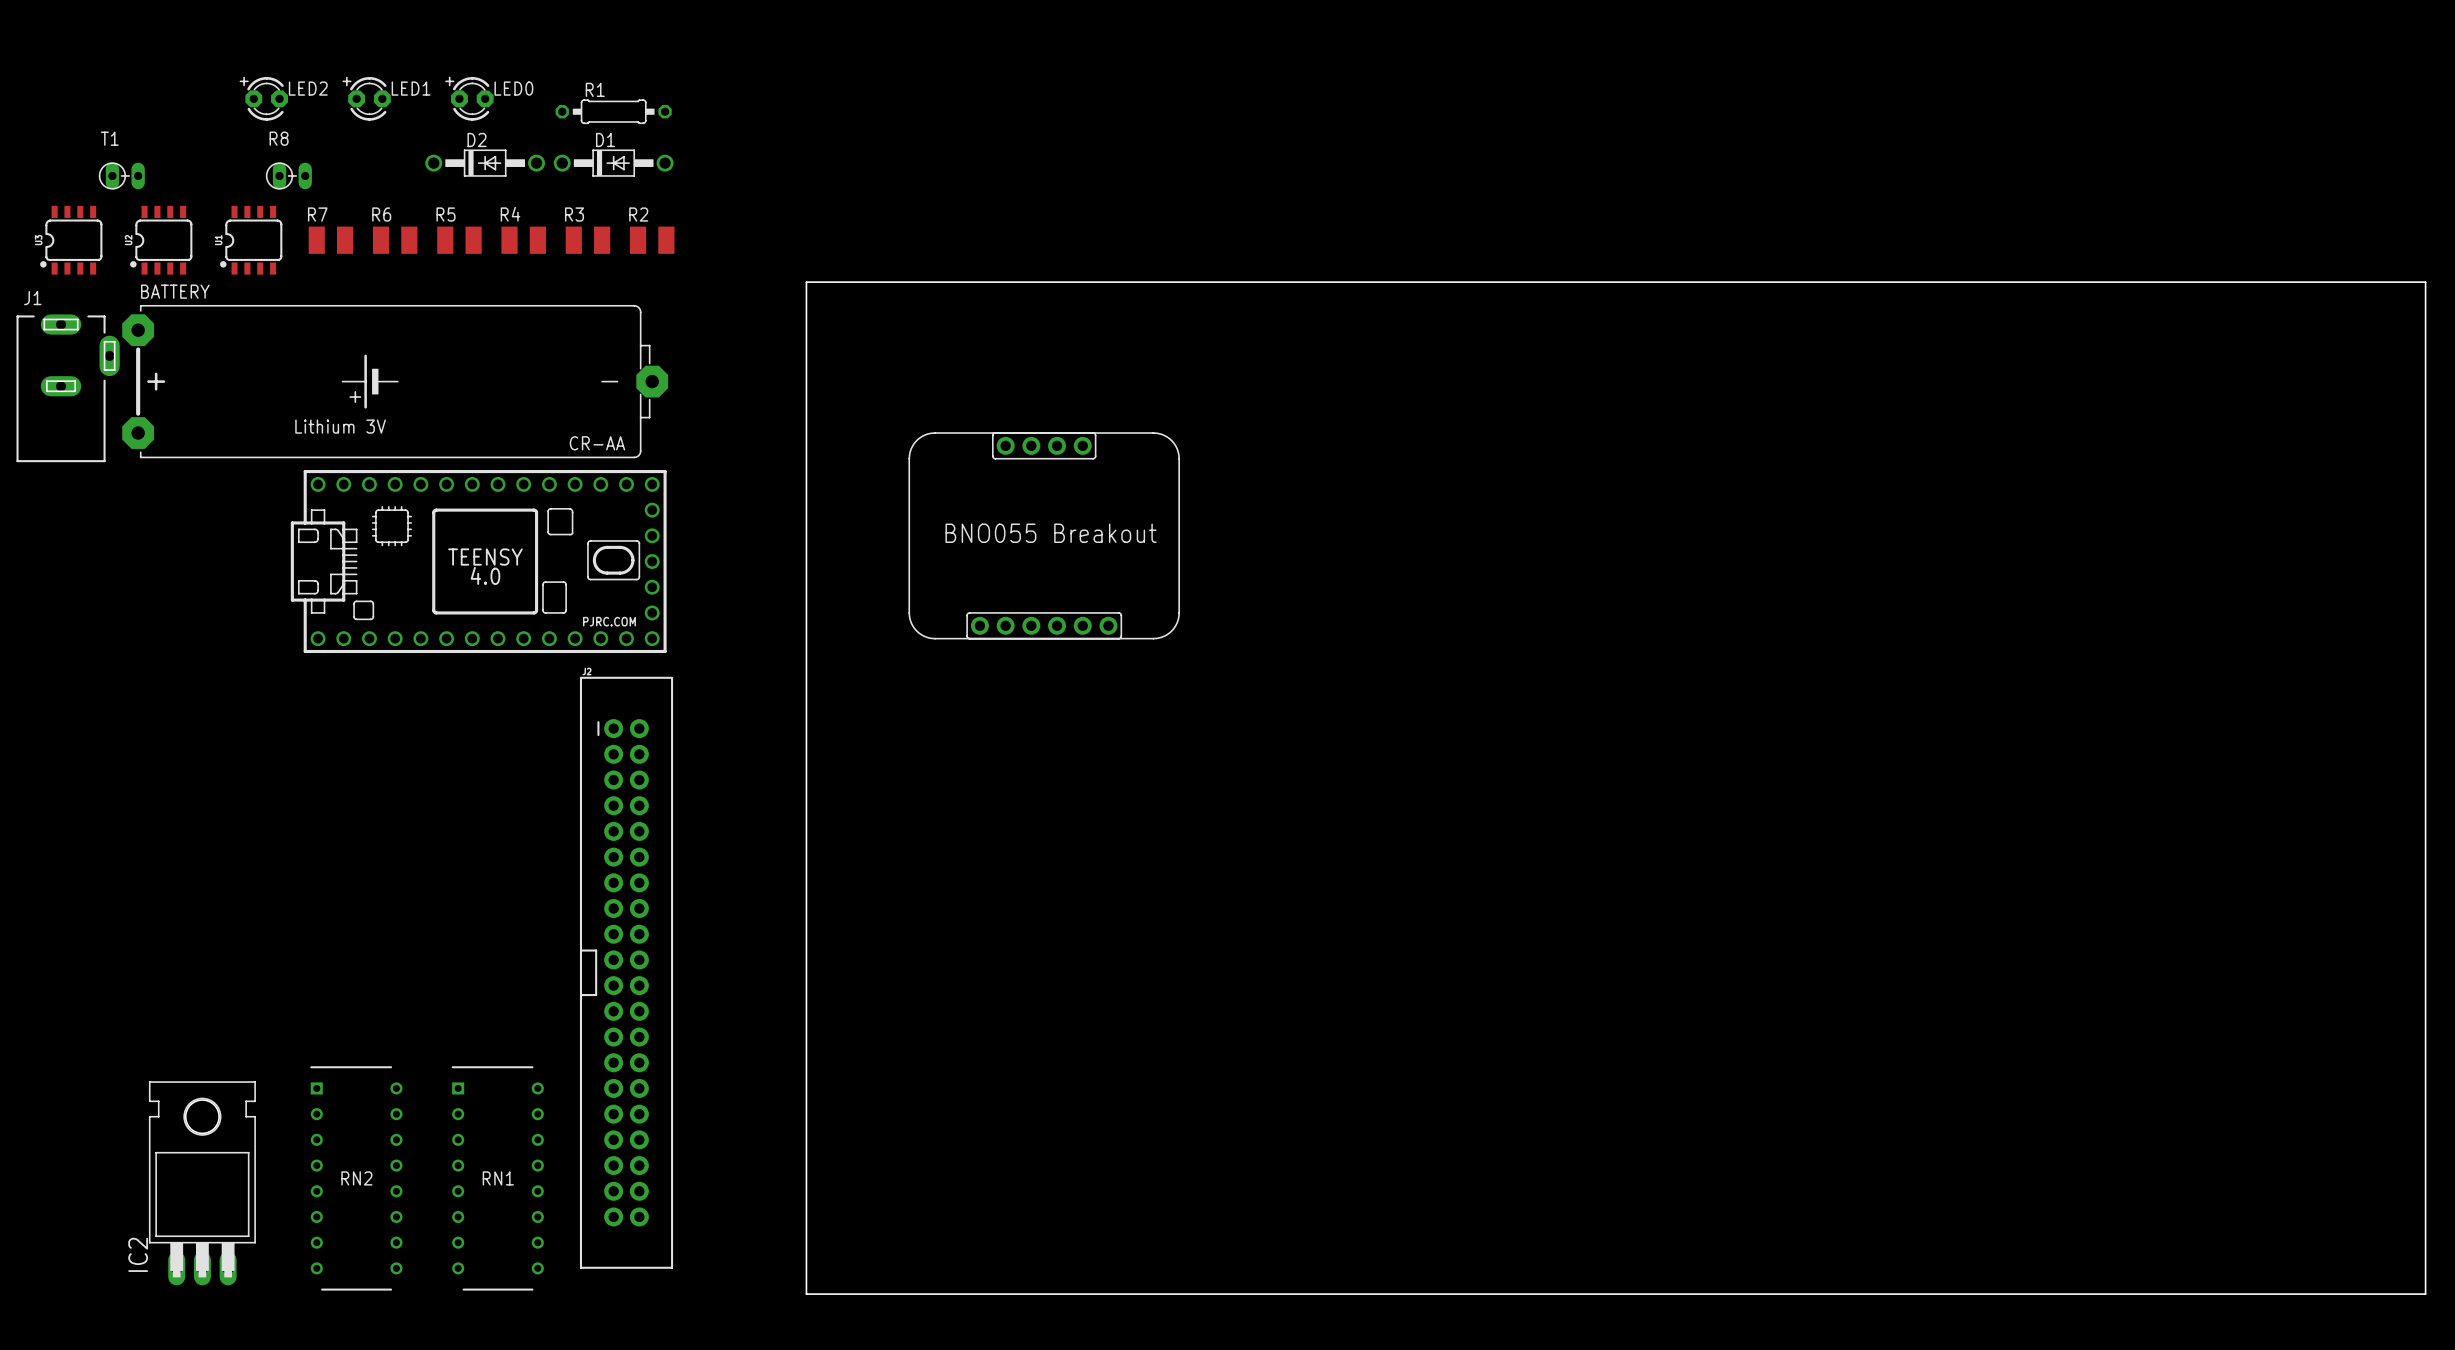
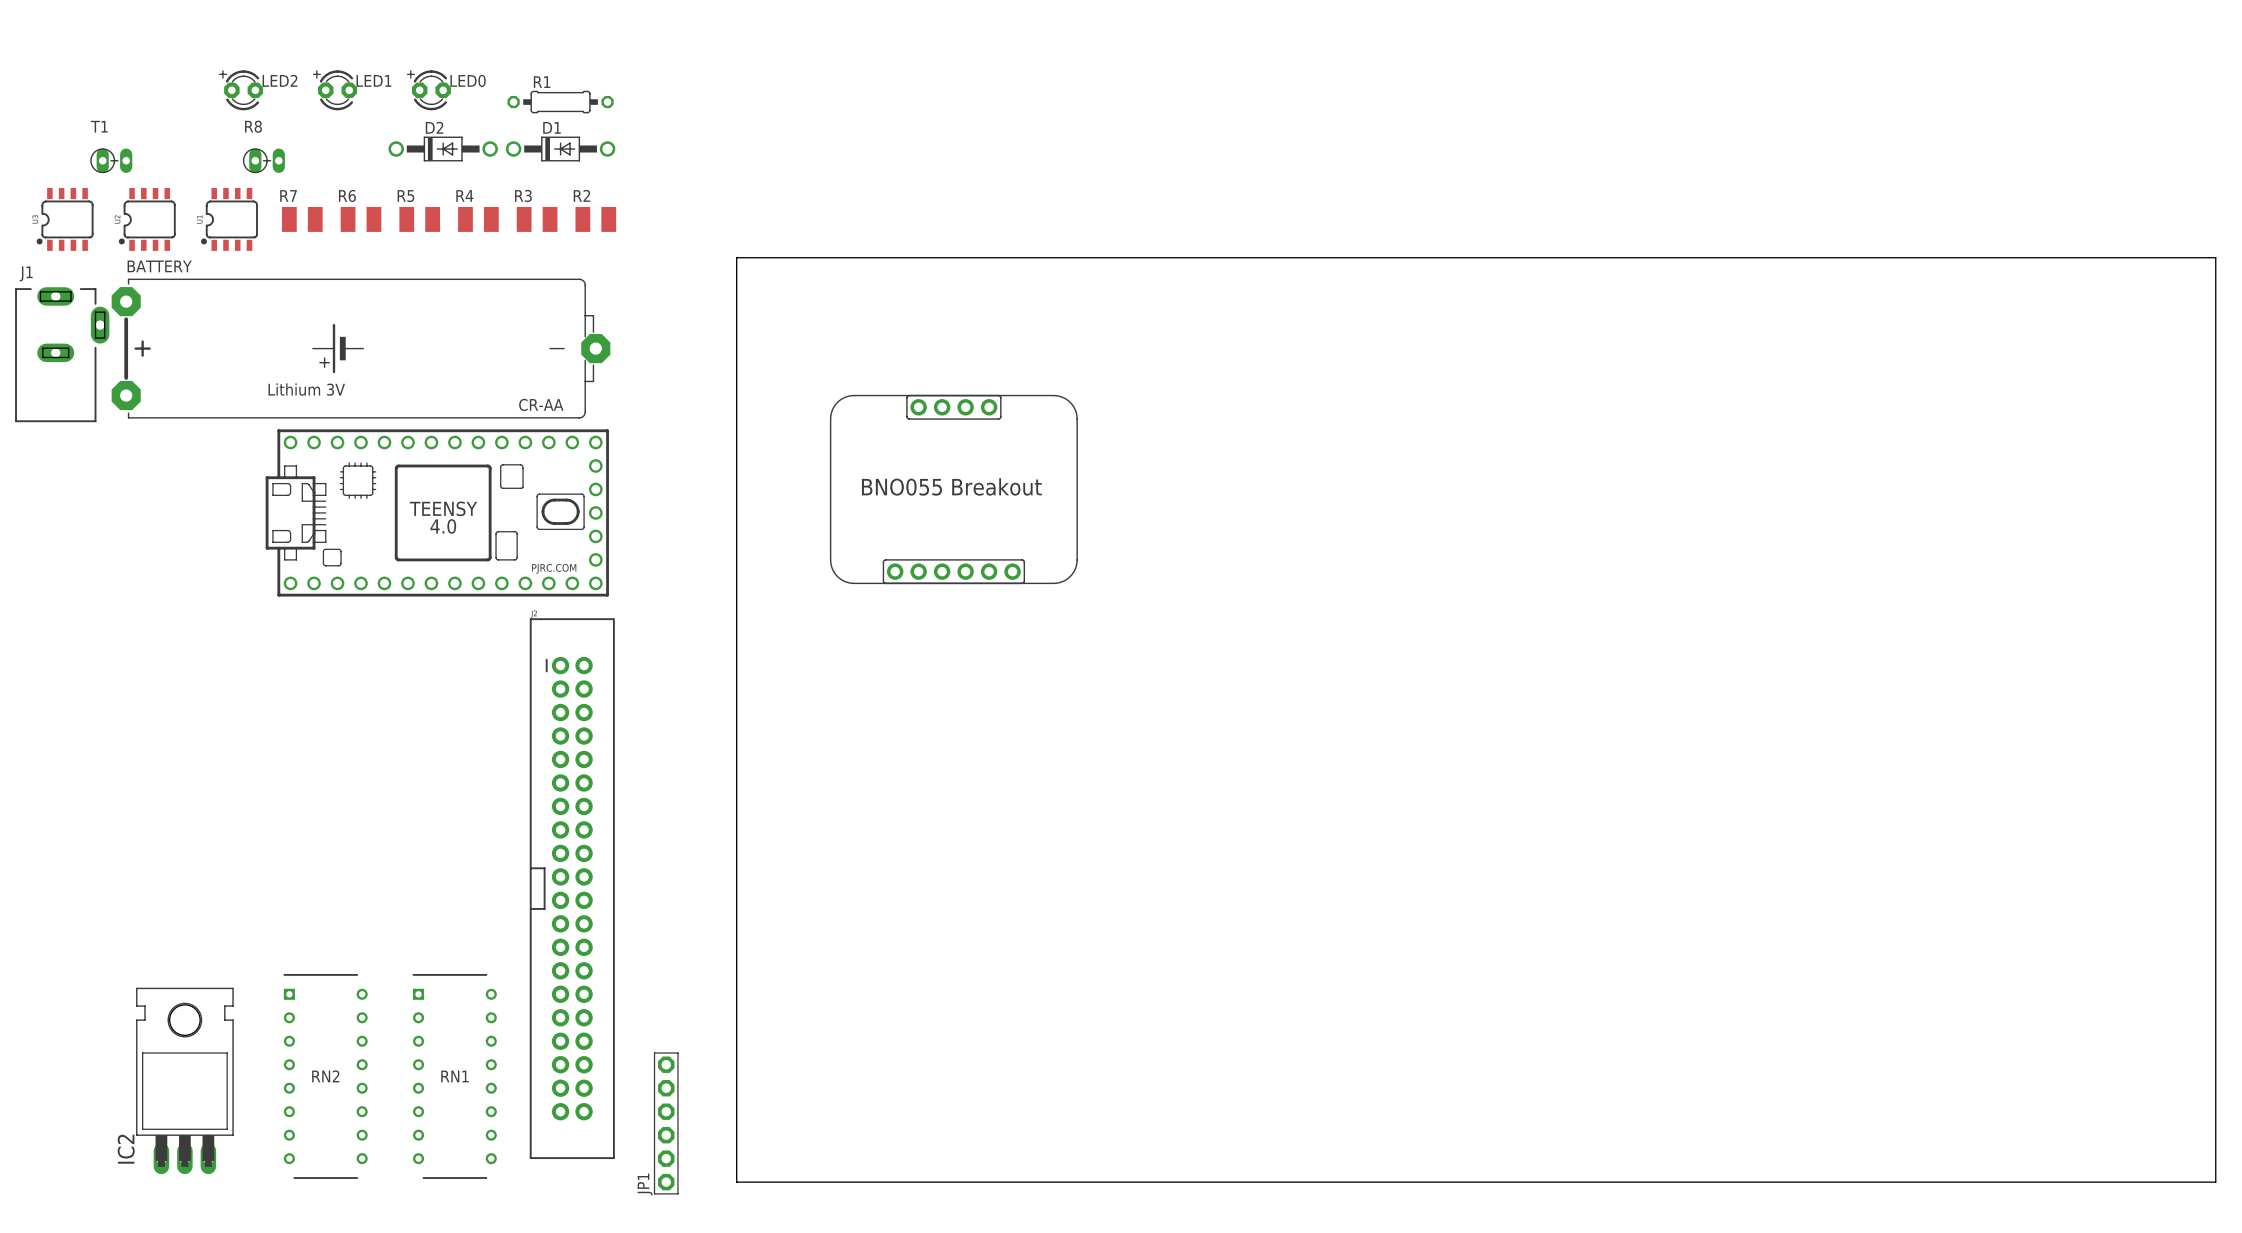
JP1: none -> (666, 1123)

